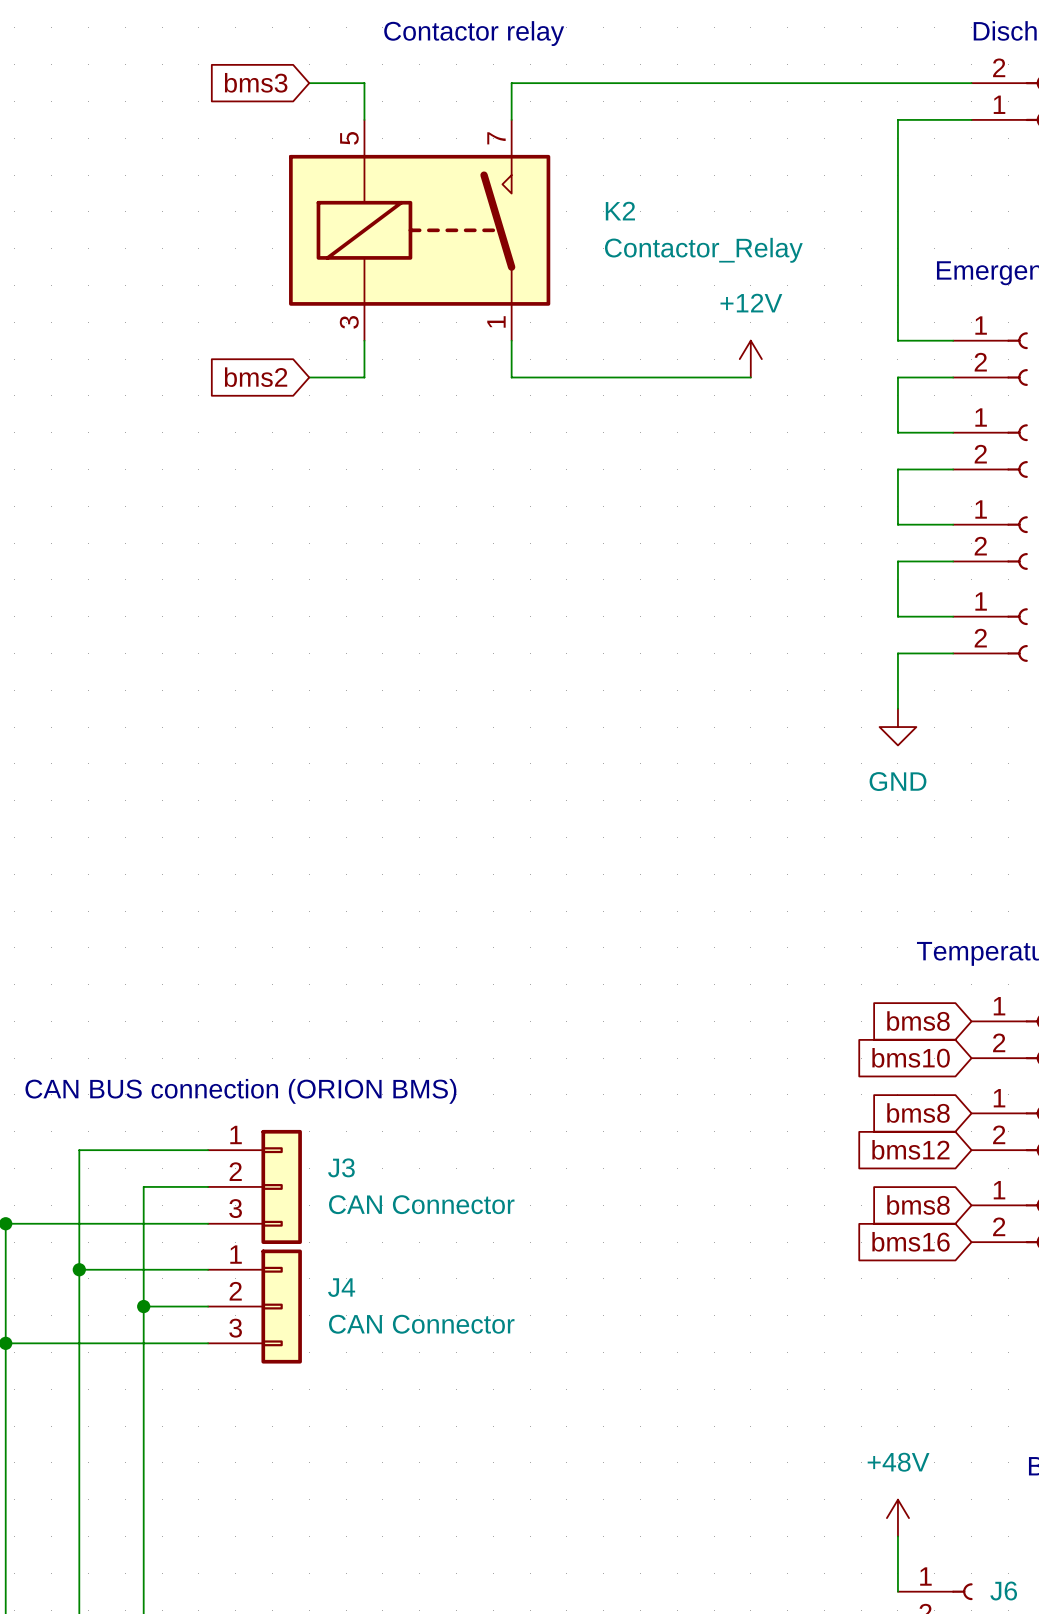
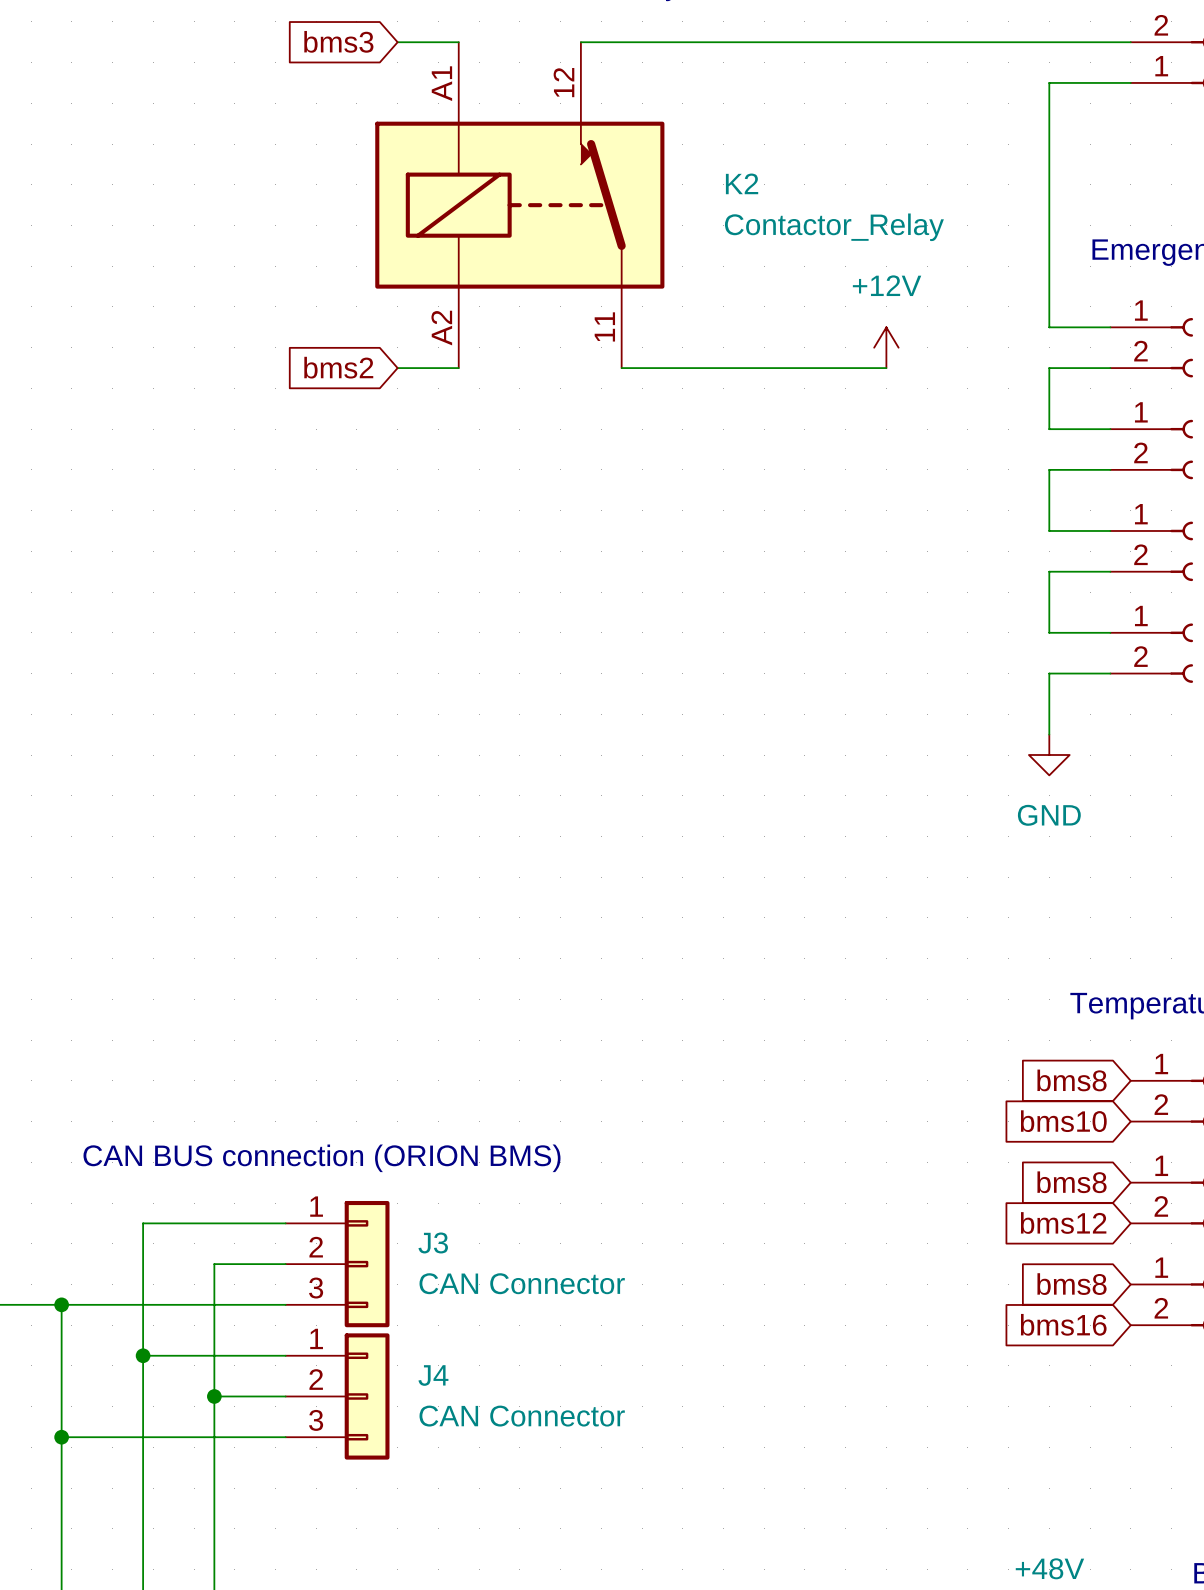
wire: (511, 83) (511, 119) -> (621, 42) (580, 42)
K2 symbol: [289, 119, 551, 341] -> [375, 42, 665, 369]

